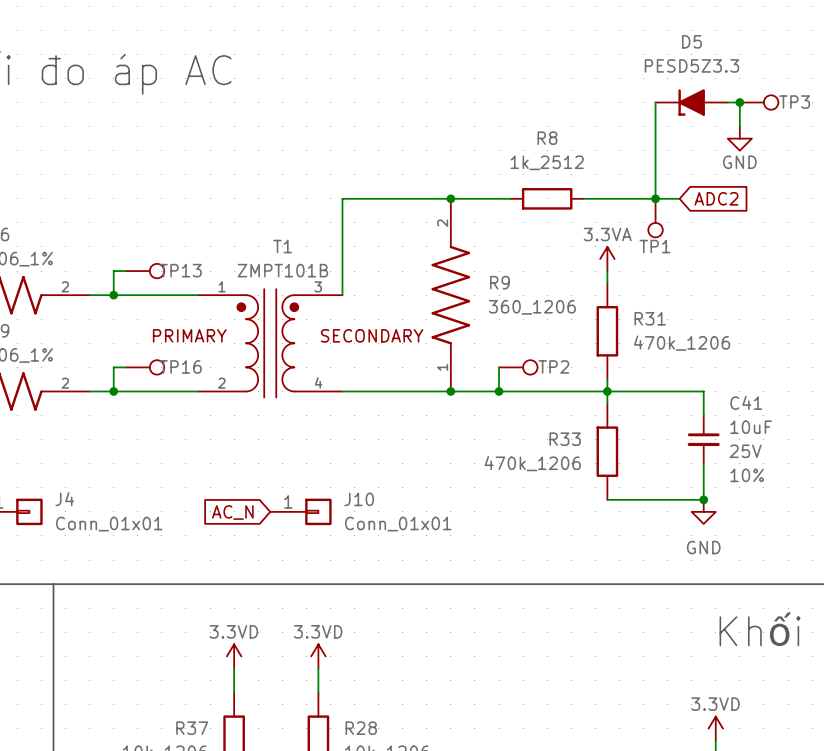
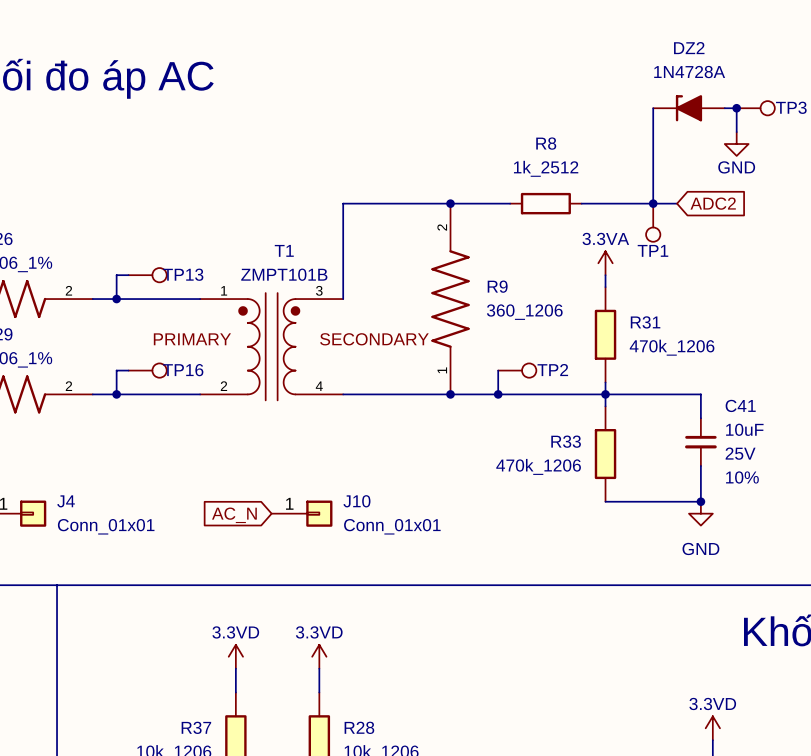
D5: PESD5Z3.3 (691, 102) -> none
DZ2: none -> 1N4728A (688, 108)

